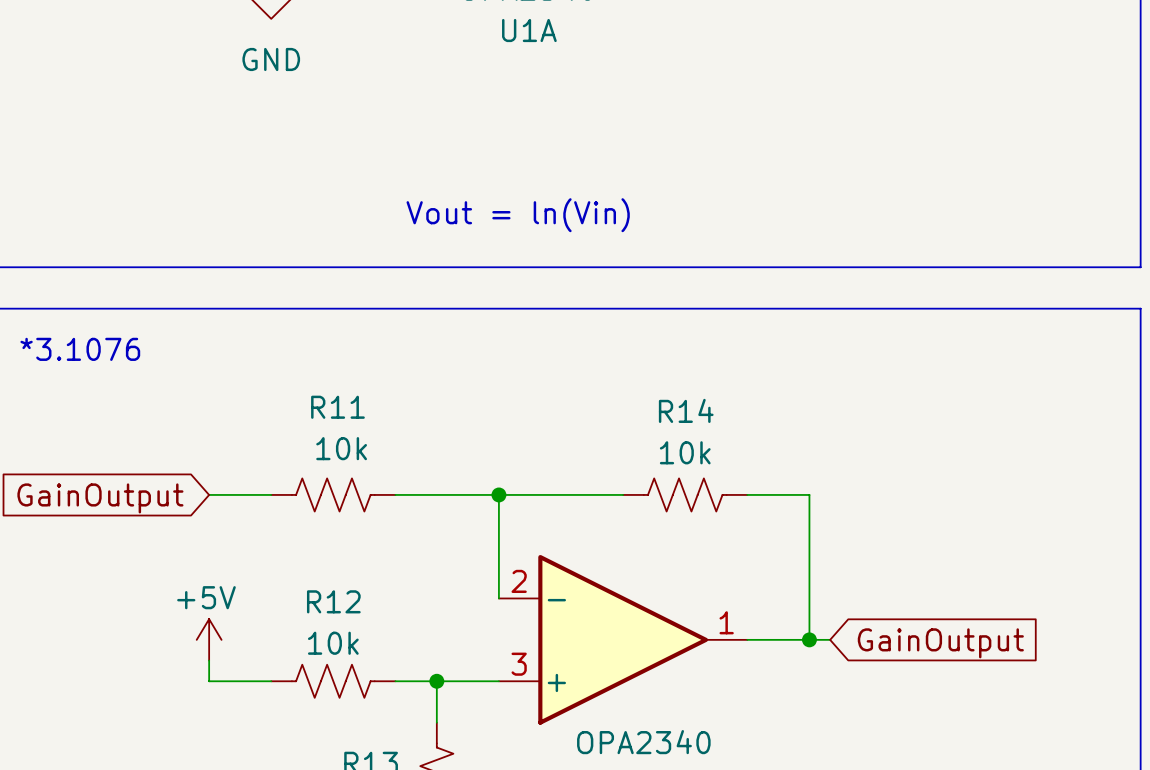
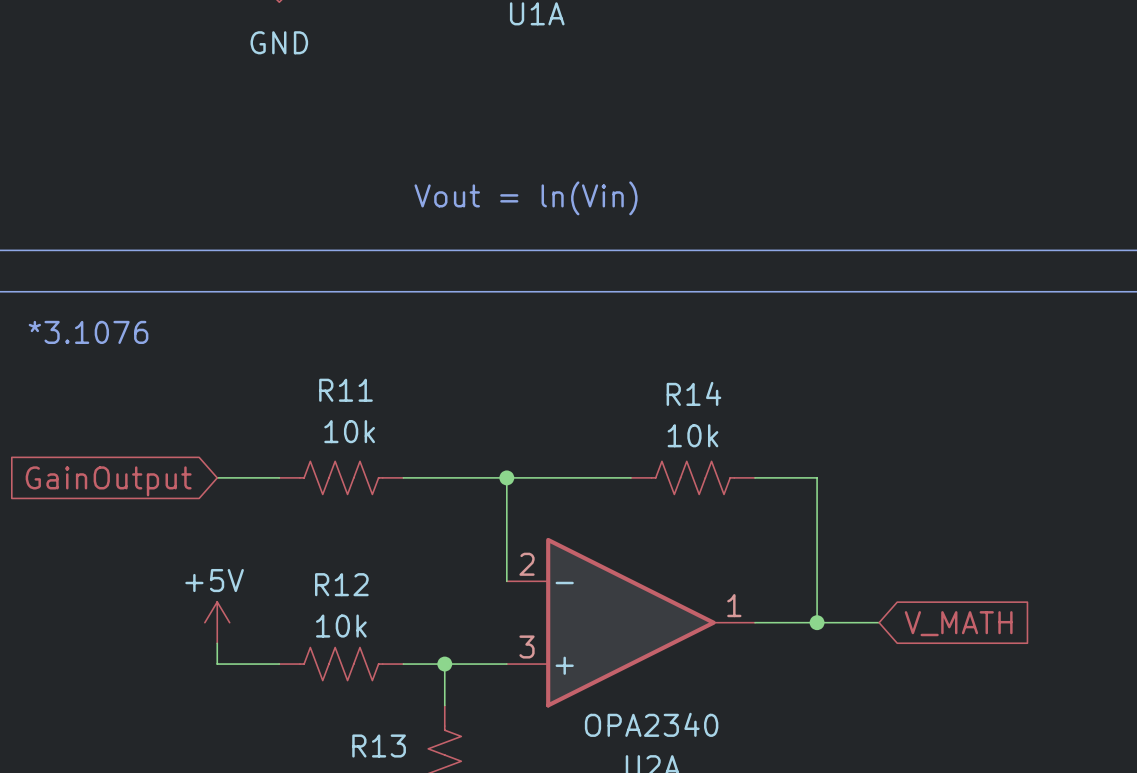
wire: none -> (837, 622) (879, 622)
global label: none -> V_MATH (958, 623)
global label: GainOutput (940, 643) -> none

